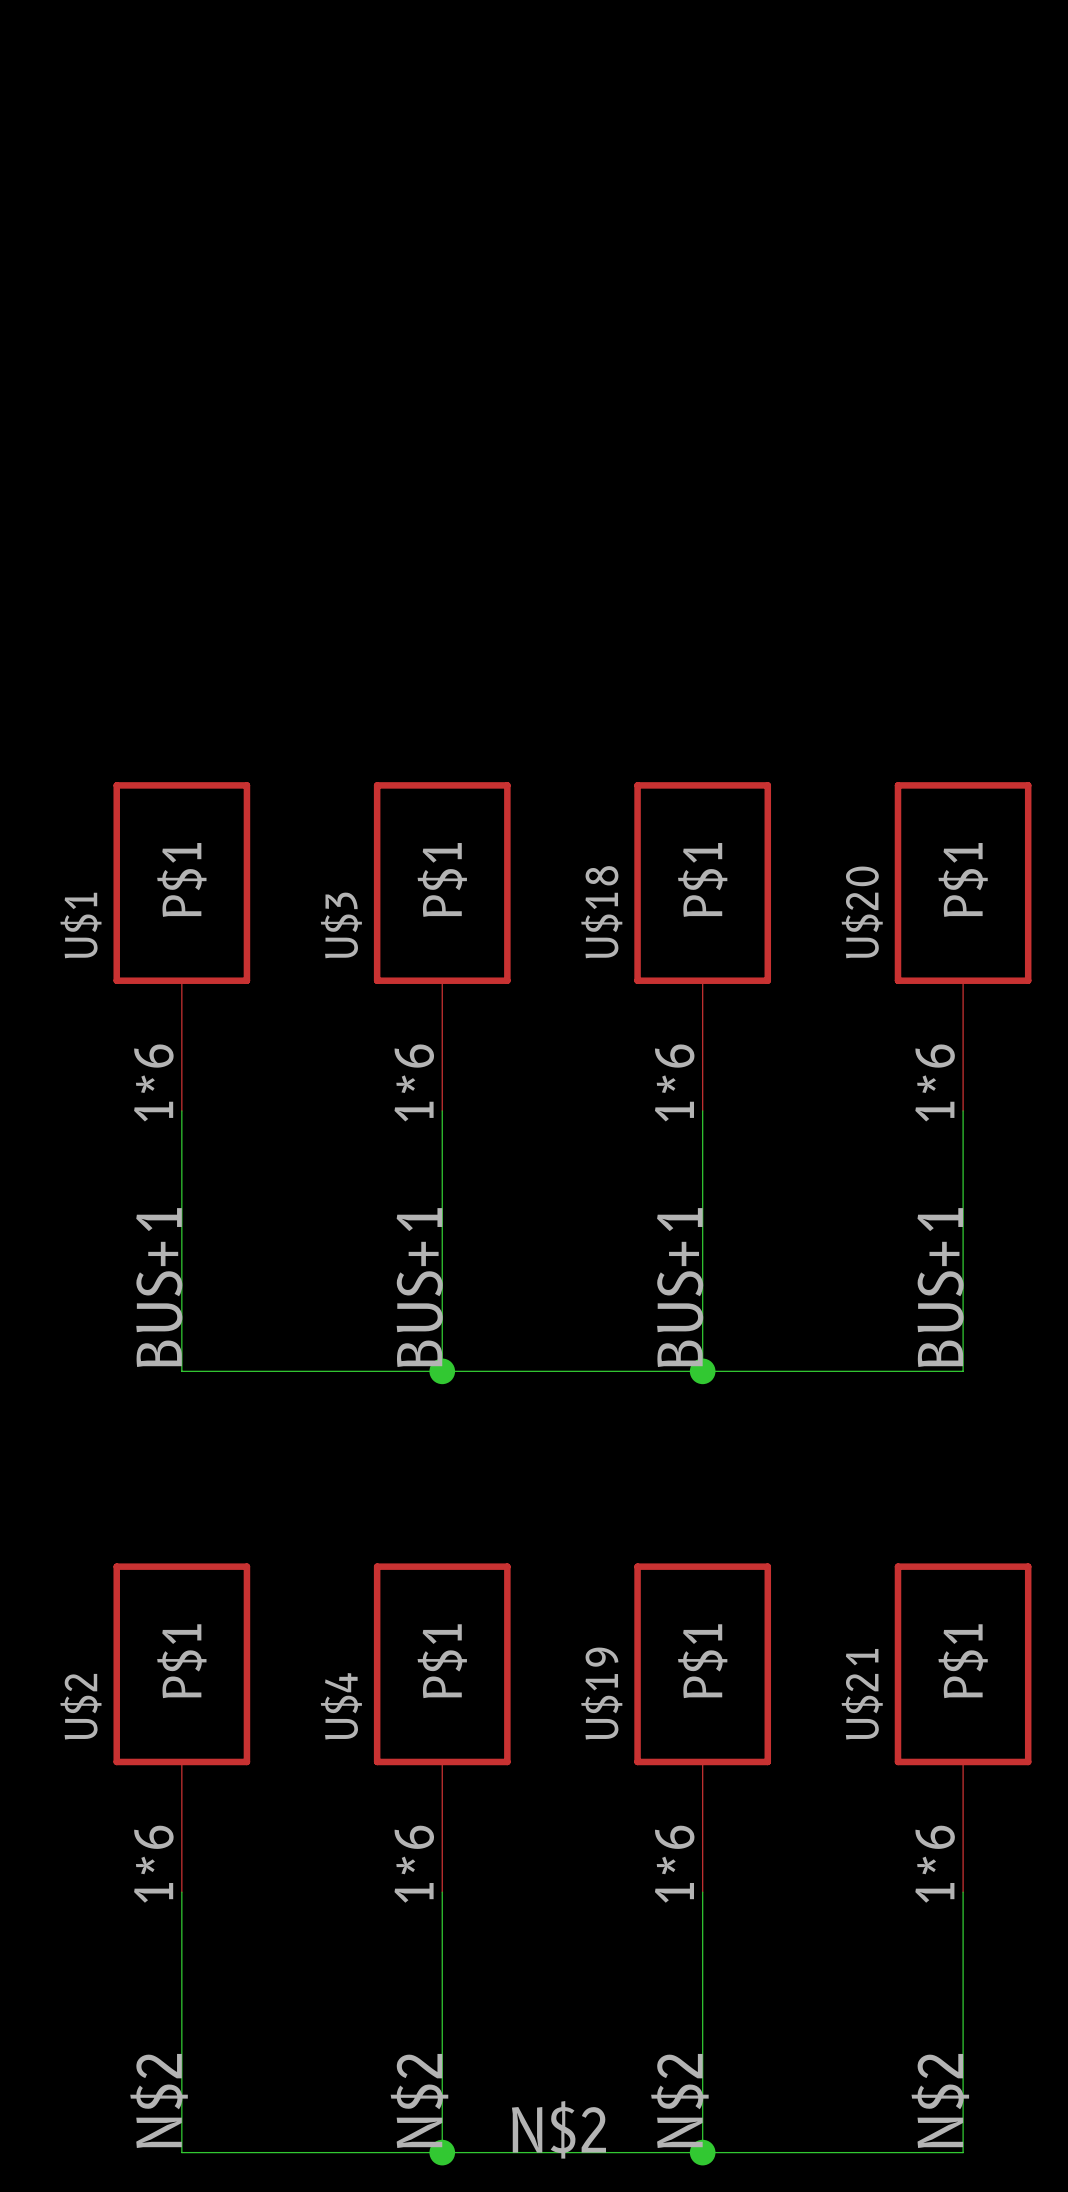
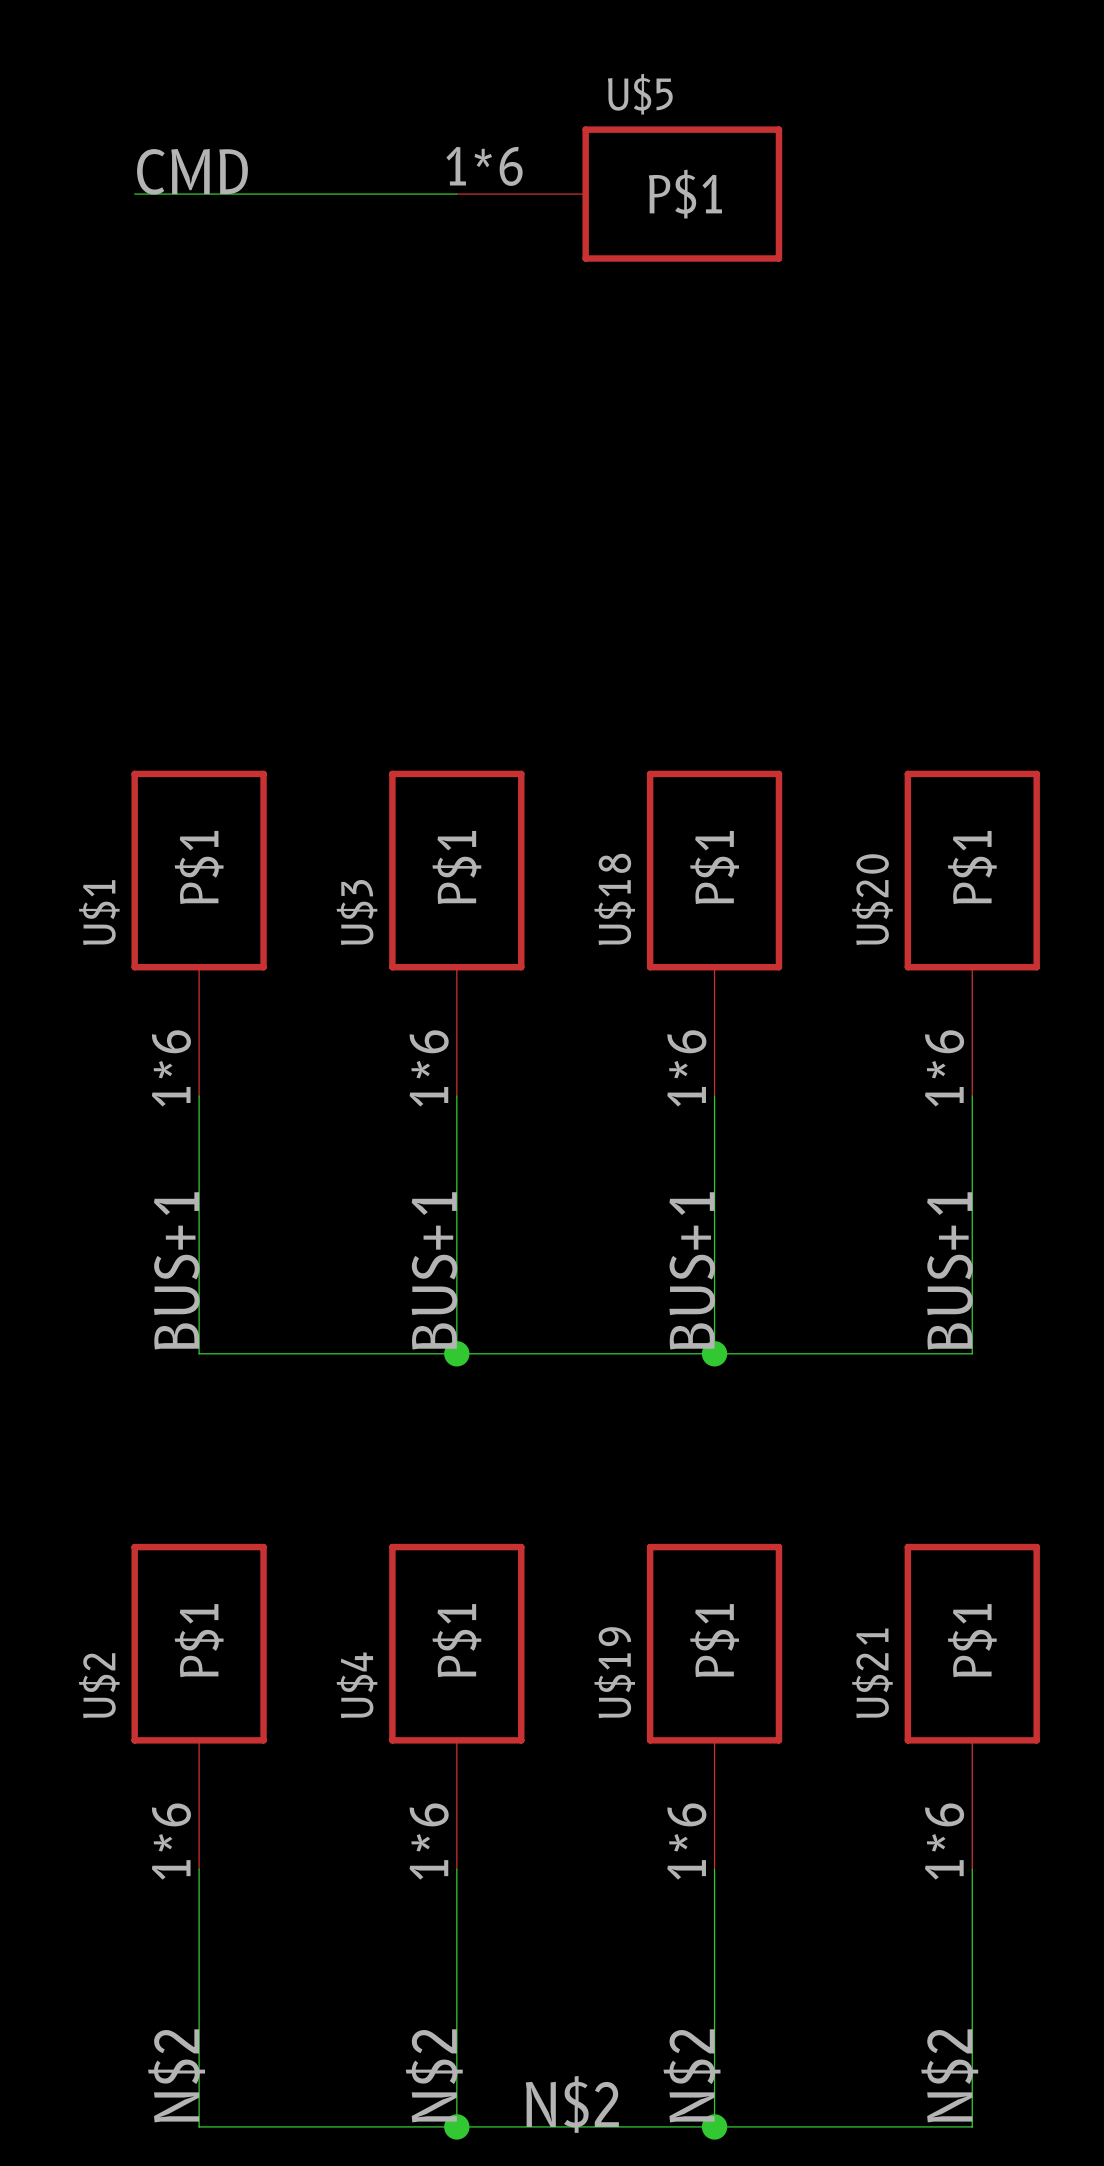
label: none -> CMD (192, 171)
wire: none -> (134, 194) (456, 194)
U$5: none -> (619, 194)

